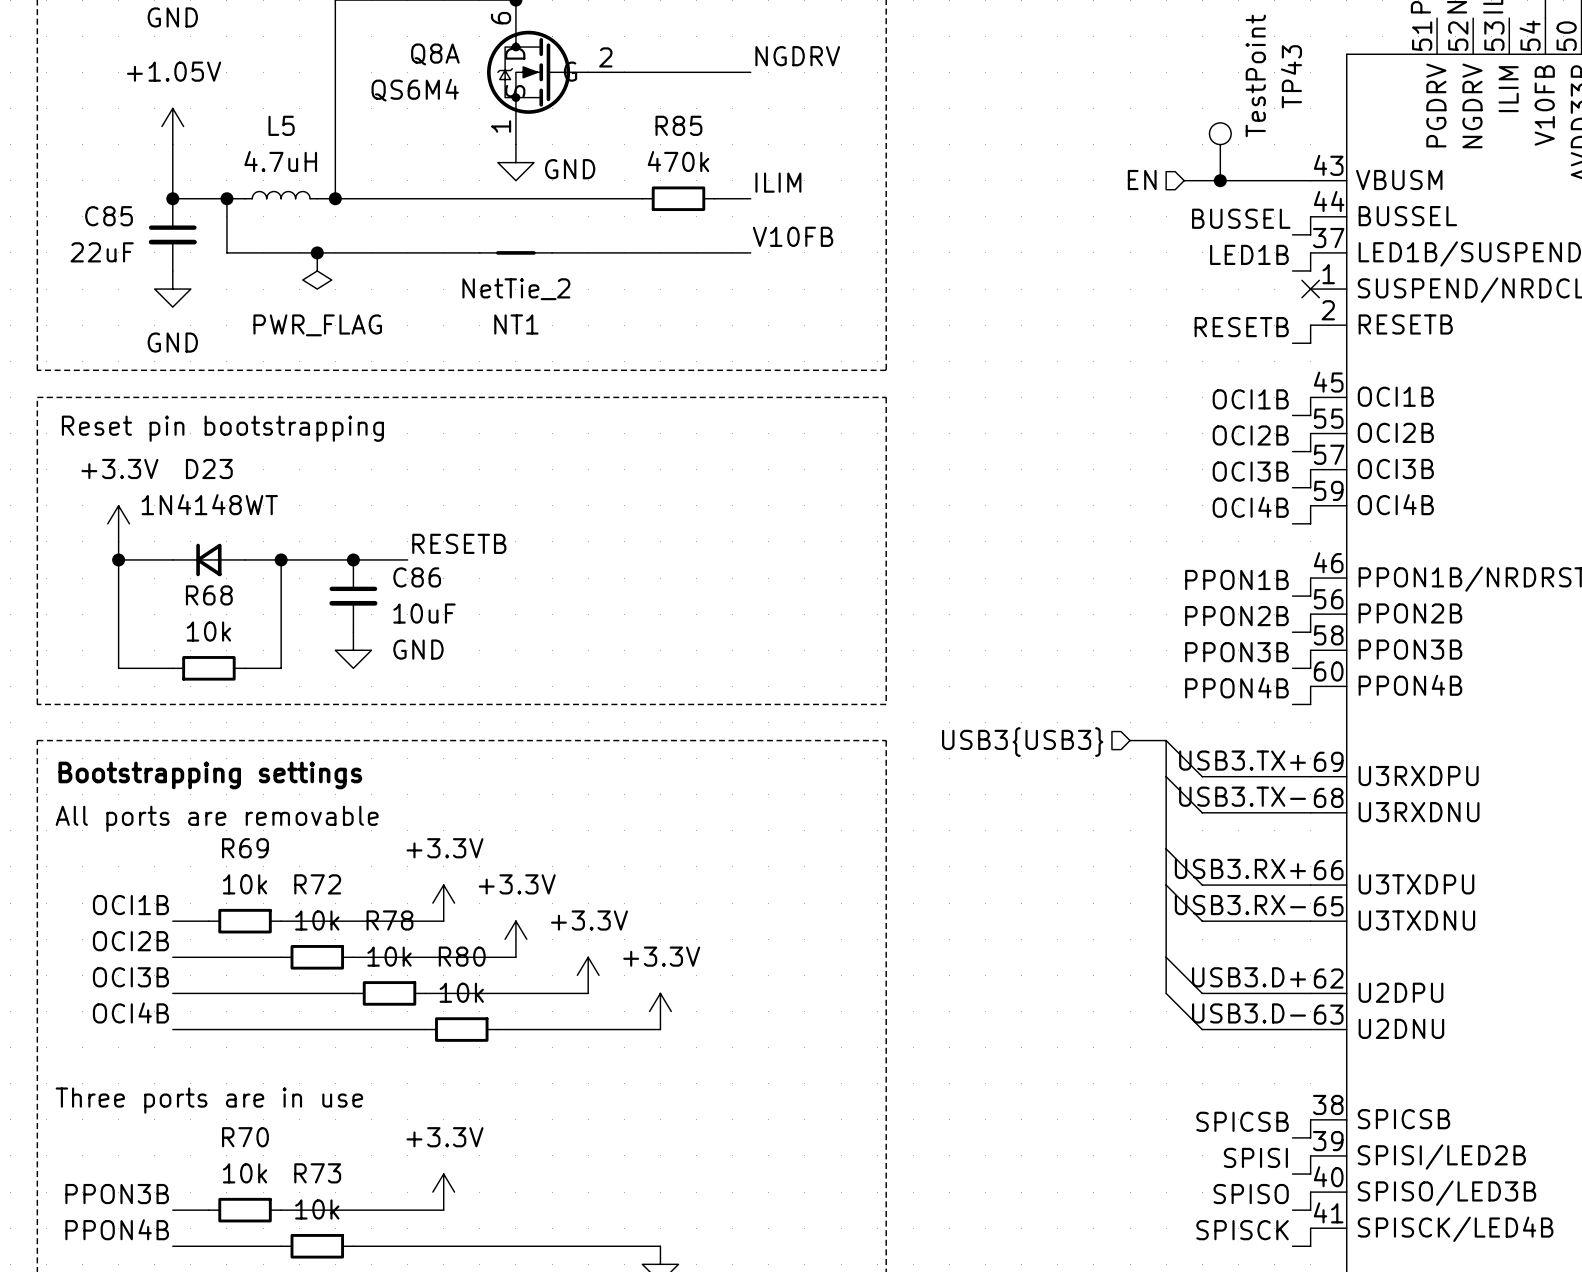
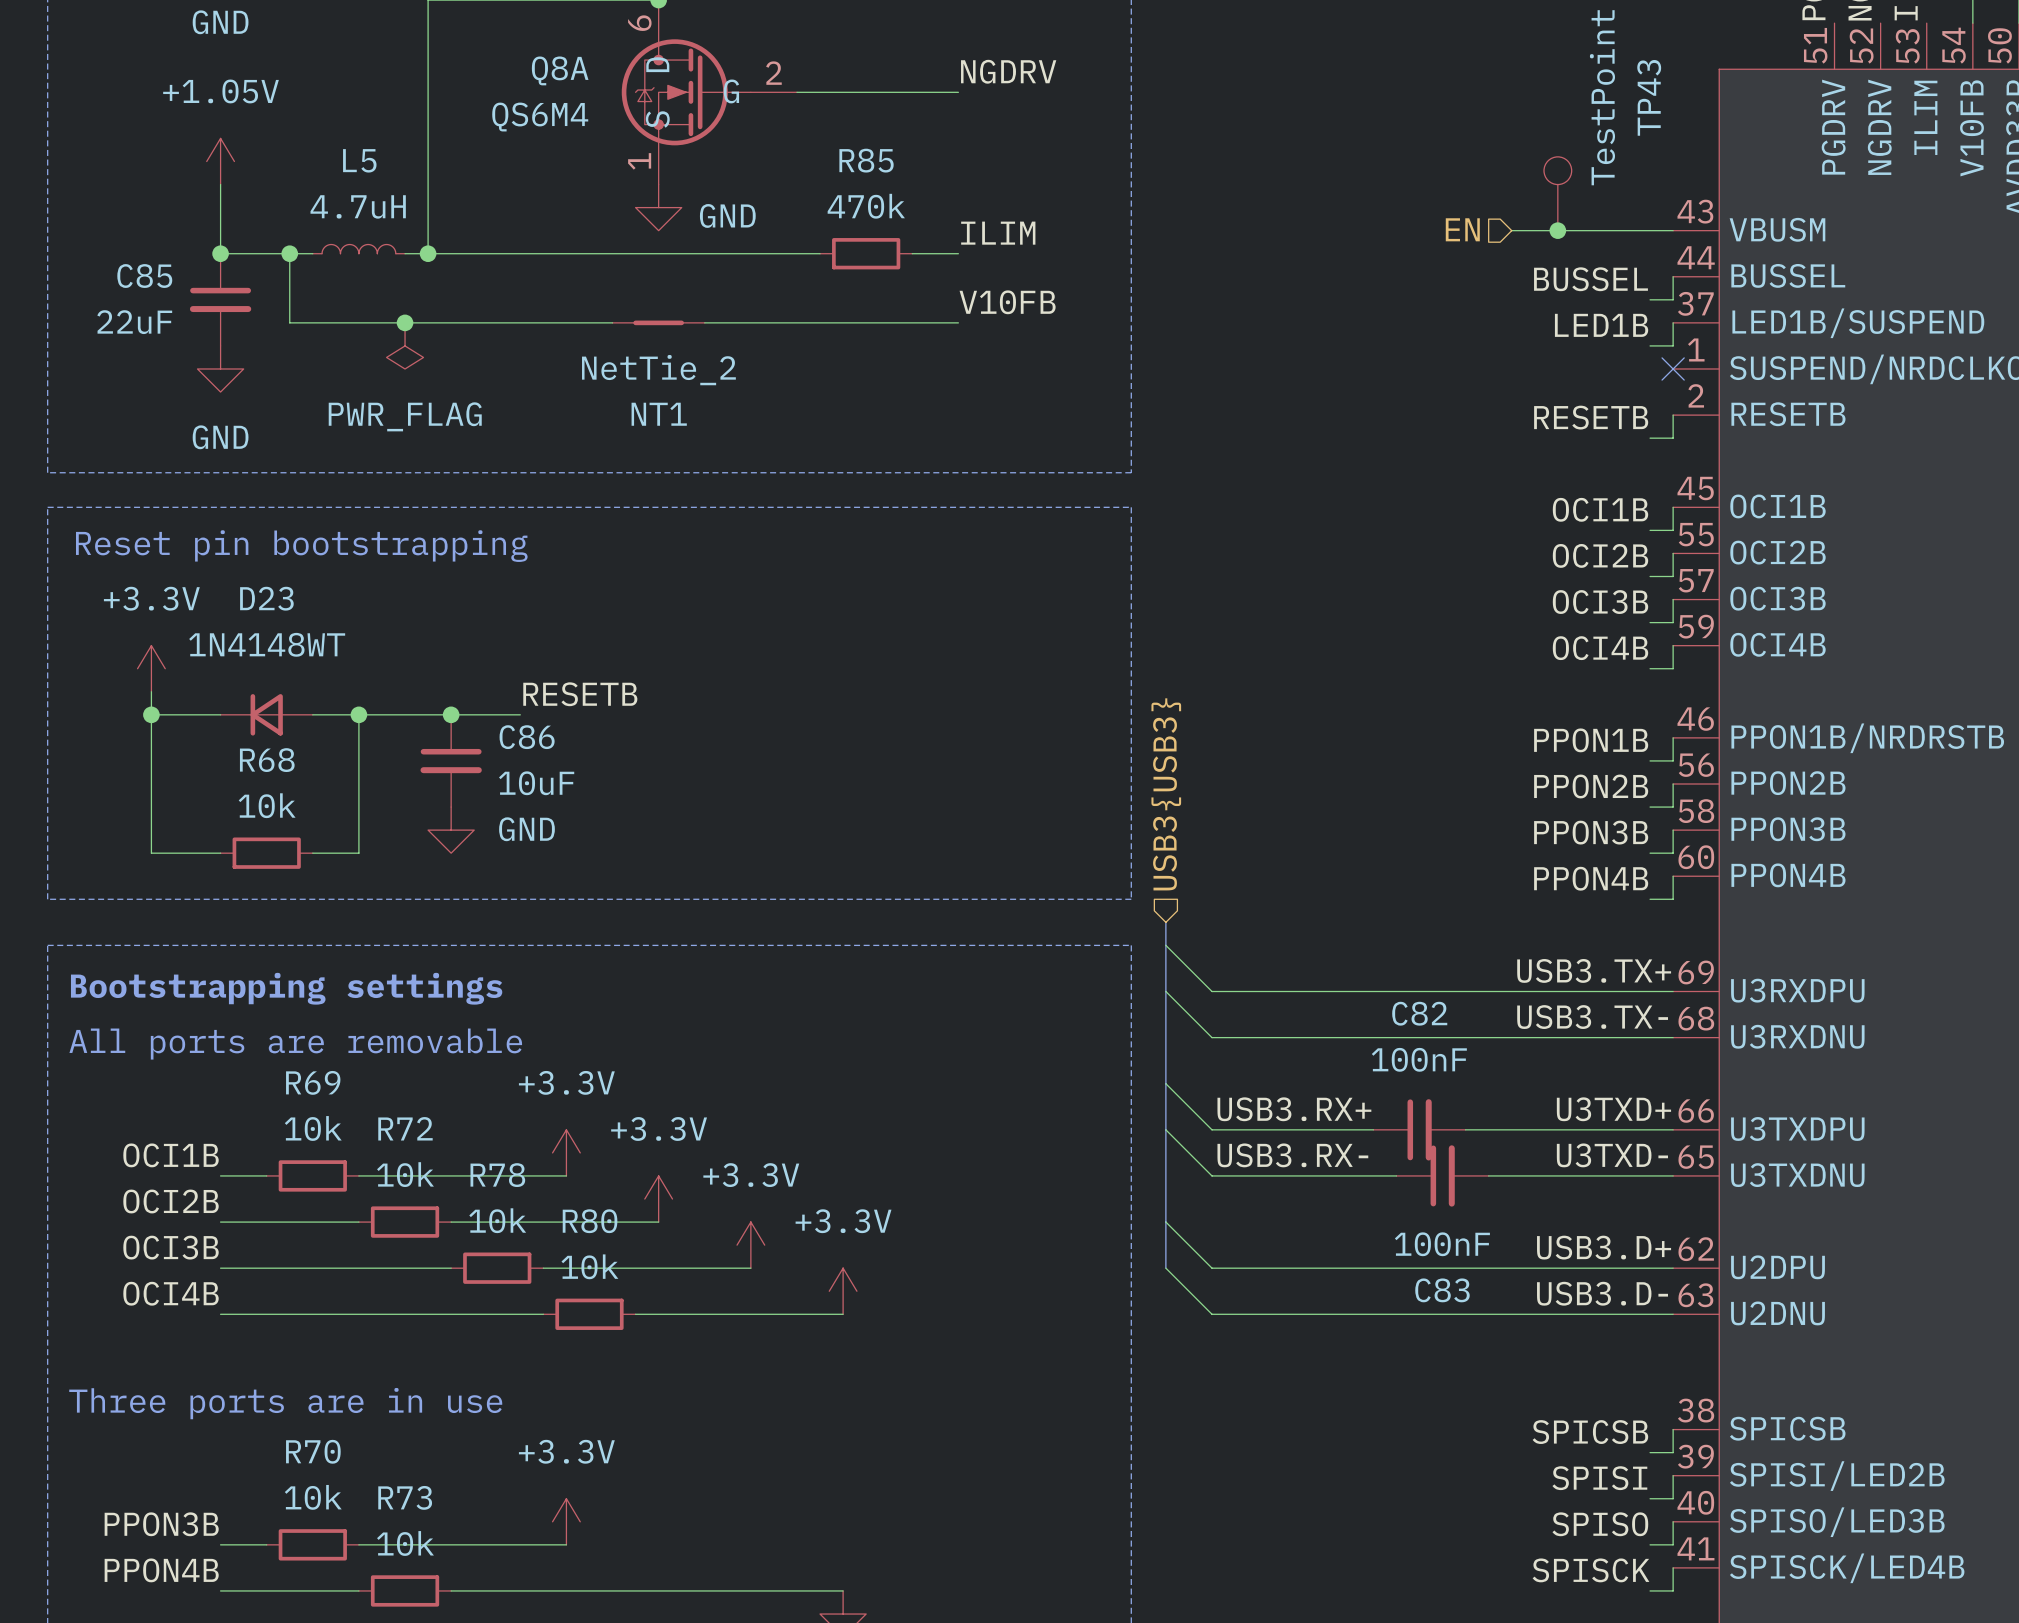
bus: none -> (1165, 922) (1165, 1268)
bus: (1130, 740) (1166, 740) (1166, 993) -> none
wire: (1166, 740) (1202, 776) -> (1165, 945) (1212, 991) (1534, 991)
hierarchical label rotation: 0° (1022, 742) -> 90° clockwise (1166, 794)
wire: (1166, 776) (1202, 812) -> (1165, 991) (1212, 1037) (1534, 1037)
wire: none -> (1165, 1083) (1212, 1129) (1373, 1129)
wire: (1166, 848) (1202, 885) -> (1465, 1129) (1534, 1129)
label: none -> USB3.RX+ (1294, 1109)
label: USB3.RX+ (1240, 868) -> U3TXD+ (1613, 1109)
wire: none -> (1165, 1129) (1212, 1175) (1396, 1175)
C82: none -> 100nF (1419, 1129)
wire: (1166, 885) (1202, 921) -> (1488, 1175) (1534, 1175)
label: none -> USB3.RX- (1292, 1155)
label: USB3.RX- (1240, 905) -> U3TXD- (1612, 1155)
C83: none -> 100nF (1442, 1175)
wire: (1166, 957) (1202, 993) -> (1165, 1222) (1212, 1268) (1534, 1268)
wire: (1166, 993) (1202, 1029) -> (1165, 1268) (1212, 1314) (1534, 1314)

